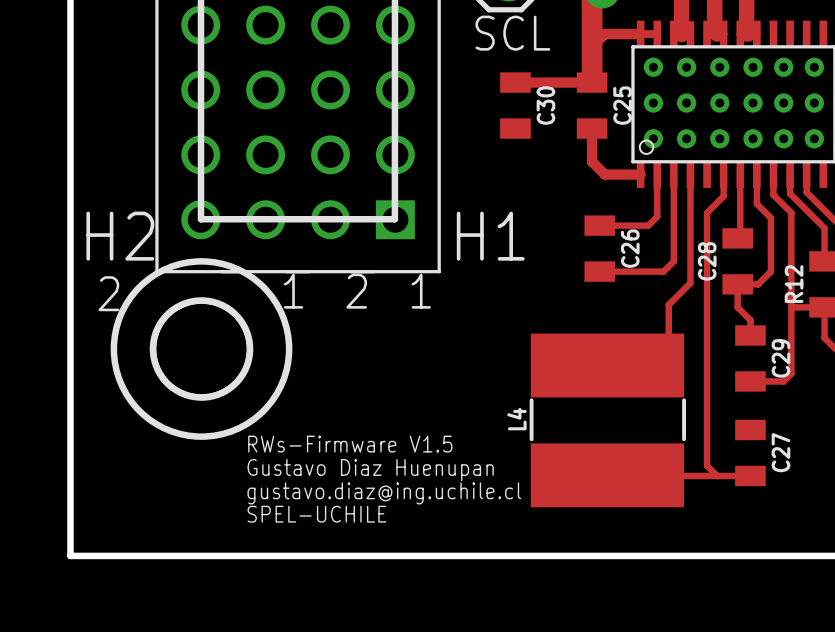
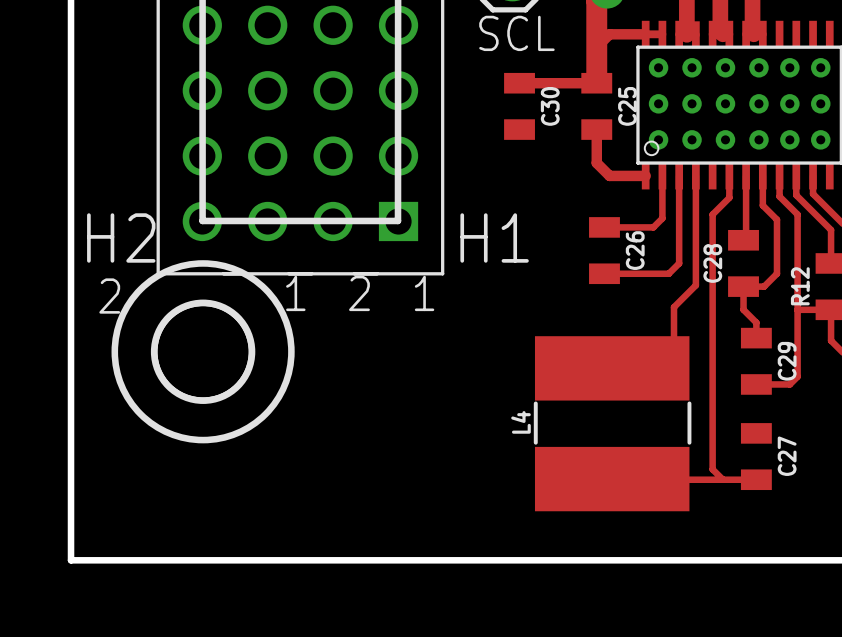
text: RWs-Firmware V1.5 (350, 444) -> none
text: Gustavo Diaz Huenupan (370, 470) -> none
text: gustavo.diaz@ing.uchile.cl (384, 493) -> none
text: SPEL-UCHILE (316, 514) -> none

